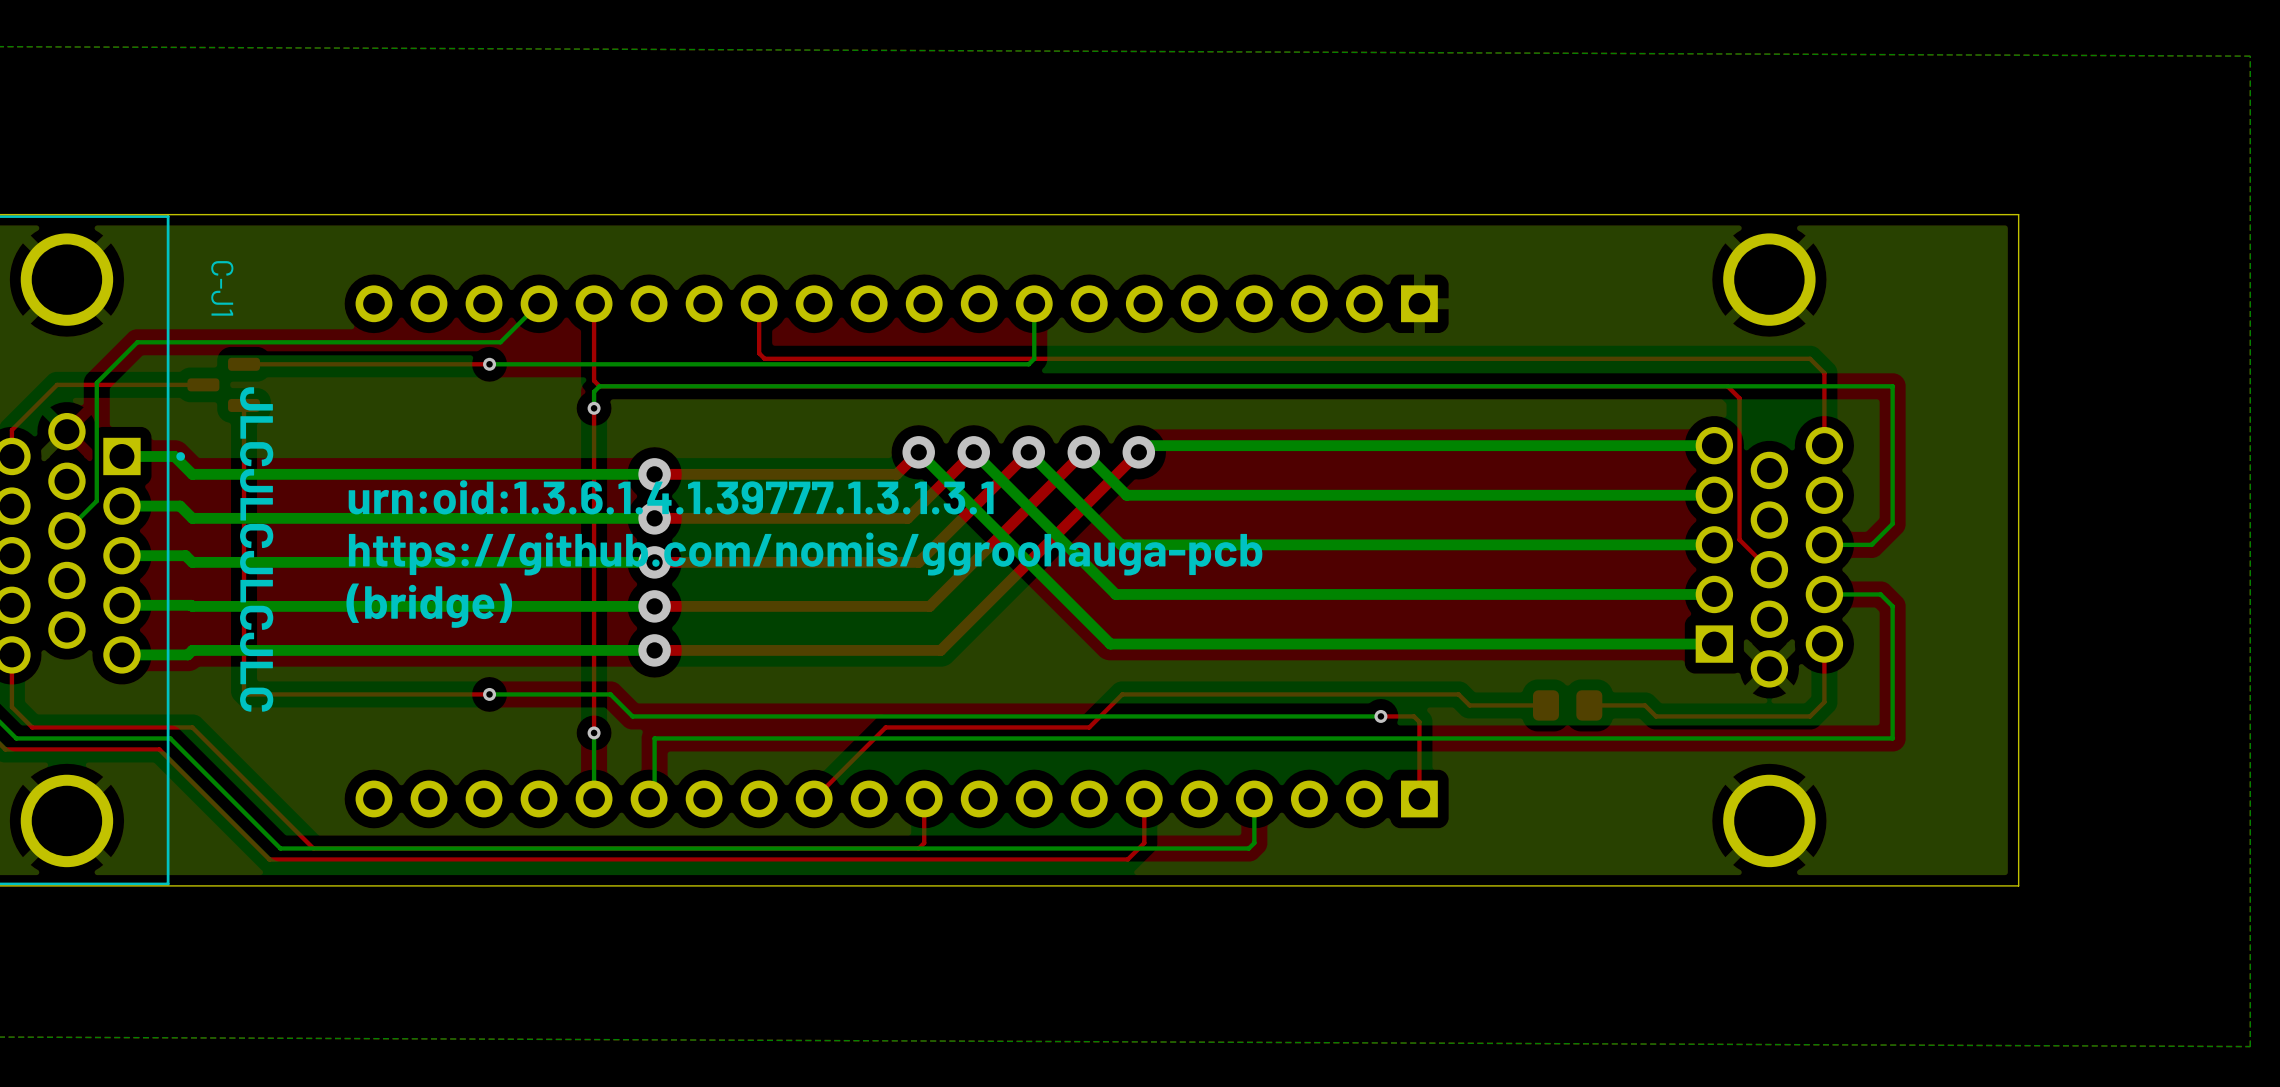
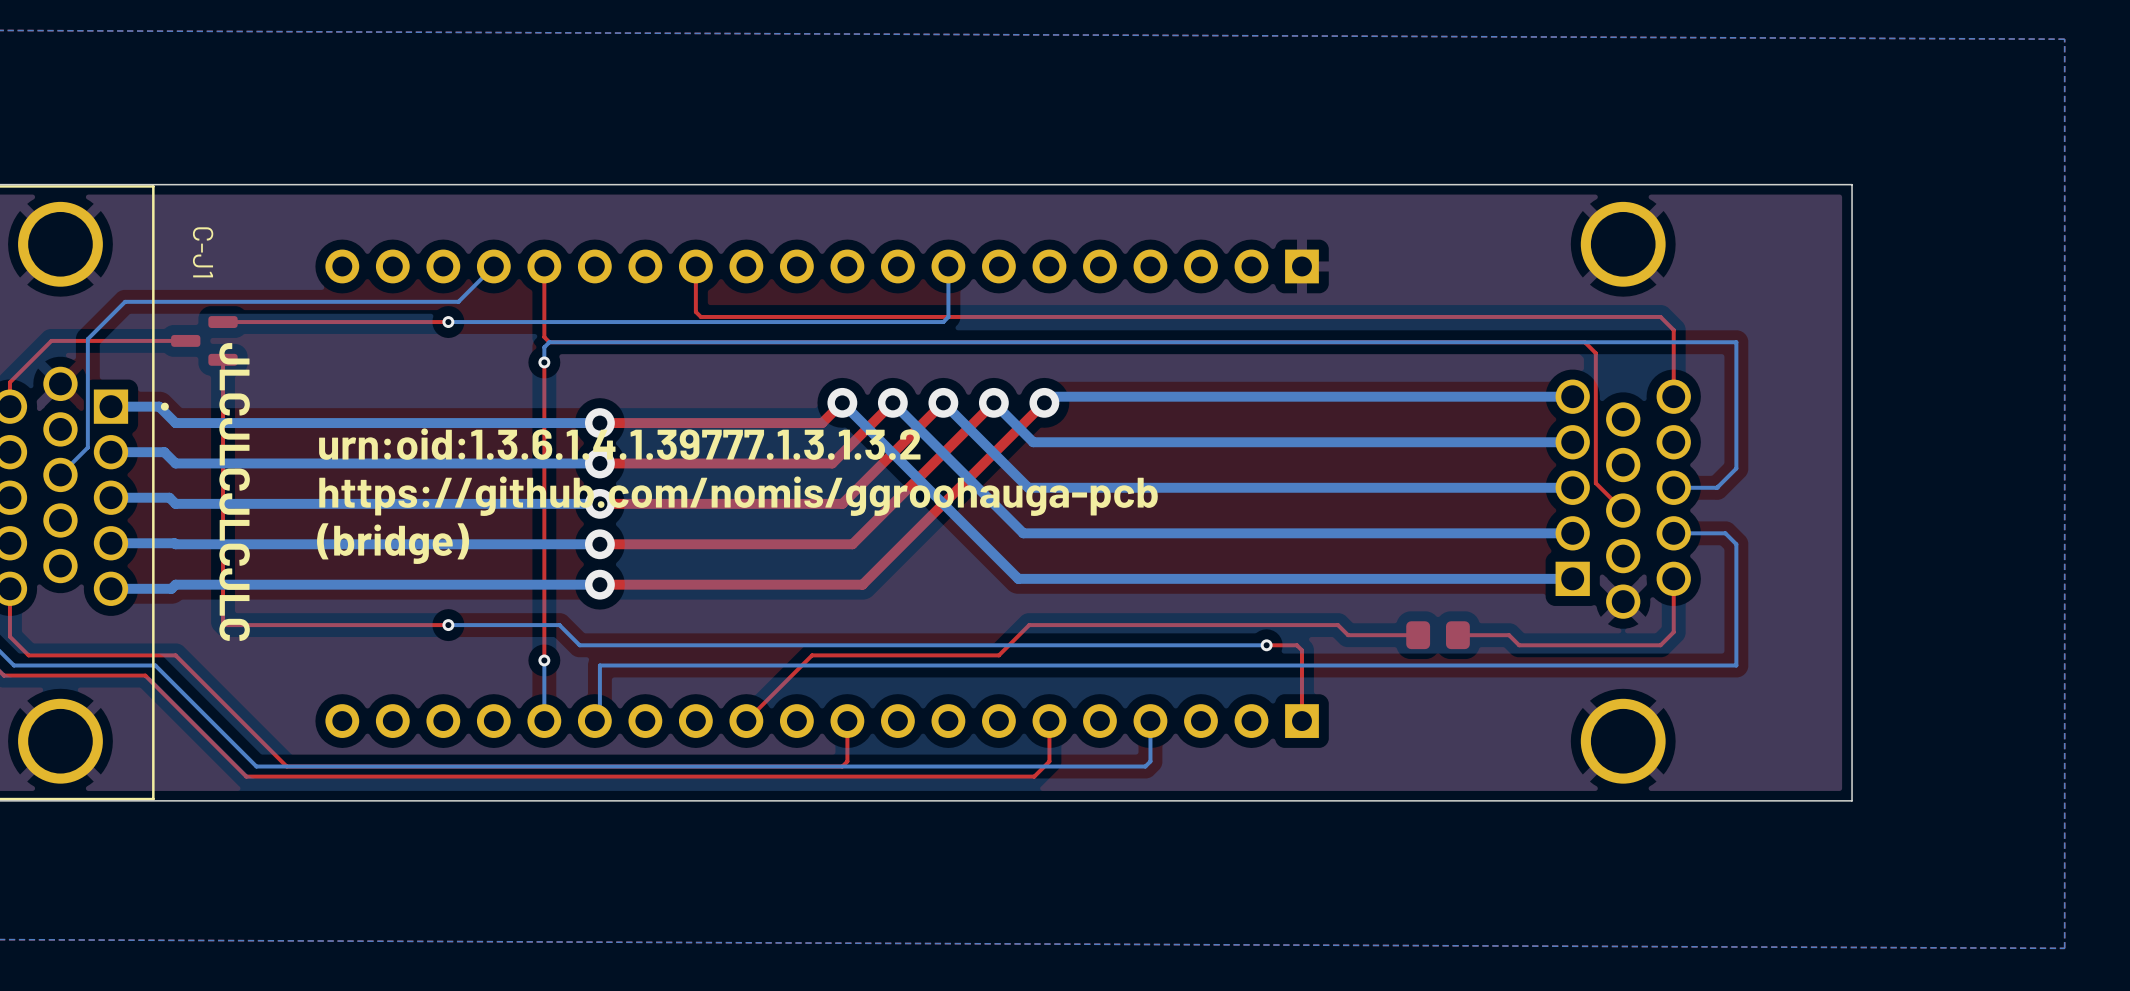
text: urn:oid:1.3.6.1.4.1.39777.1.3.1.3.1 (671, 497) -> urn:oid:1.3.6.1.4.1.39777.1.3.1.3.2 (619, 444)

